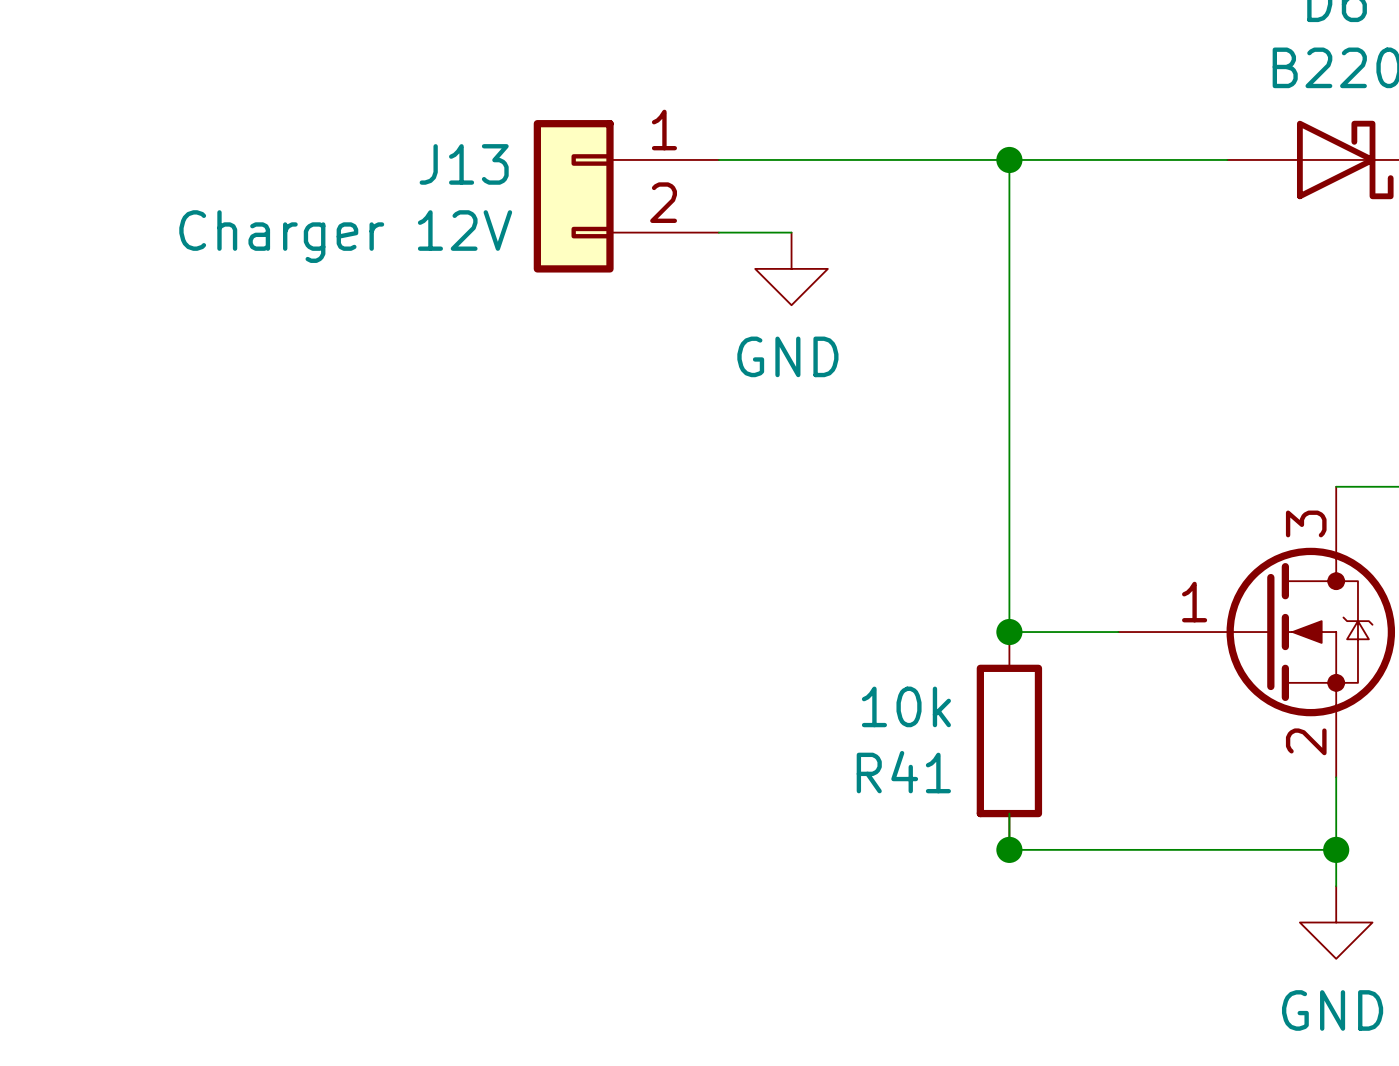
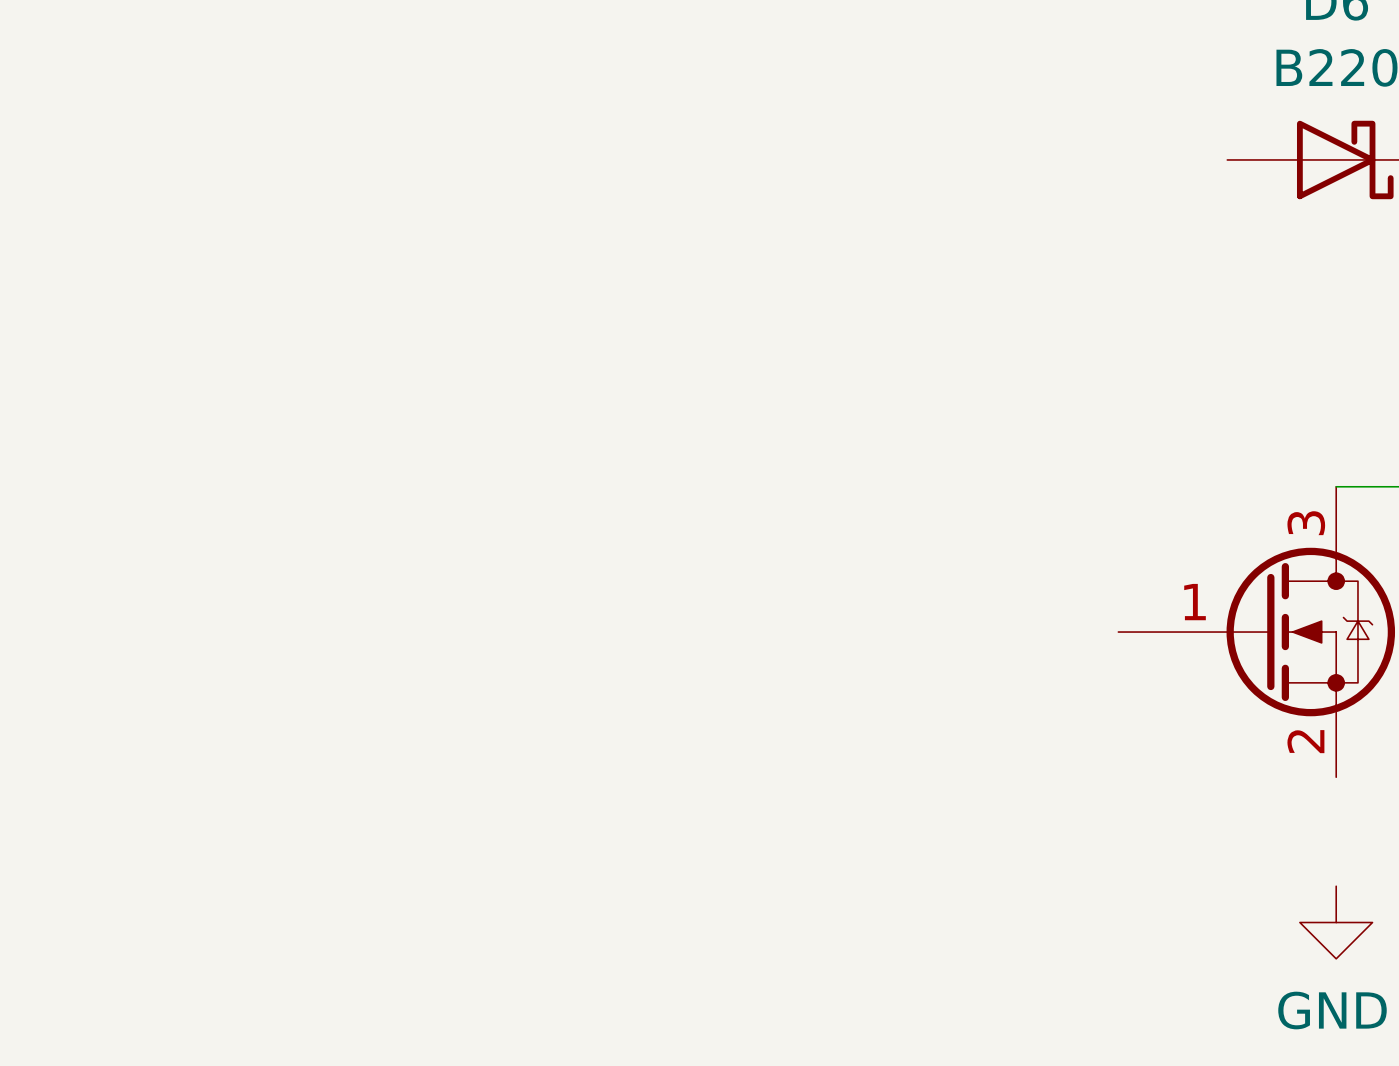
wire: (718, 159) (1227, 159) -> none
wire: (1009, 159) (1009, 632) (1118, 632) -> none
junction: (1009, 159) -> none
J13: Charger 12V (626, 196) -> none
wire: (718, 232) (791, 232) -> none
power symbol: GND (791, 268) -> none
junction: (1009, 632) -> none
R41: 10k (1009, 740) -> none
wire: (1336, 777) (1336, 886) -> none
wire: (1009, 813) (1009, 849) (1336, 849) -> none
junction: (1009, 849) -> none
junction: (1336, 849) -> none

